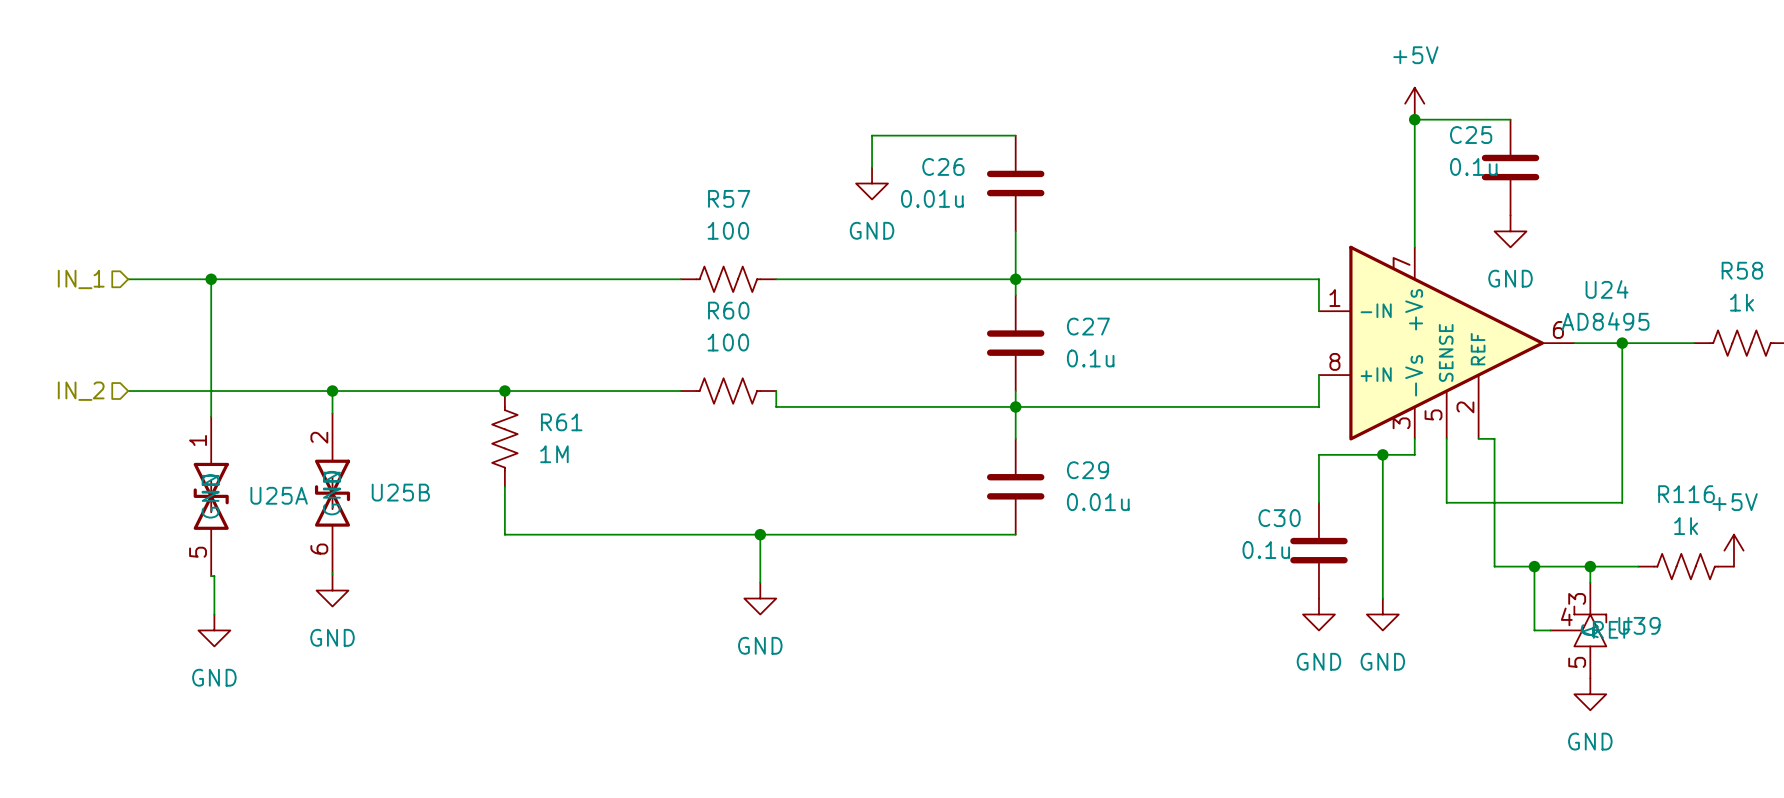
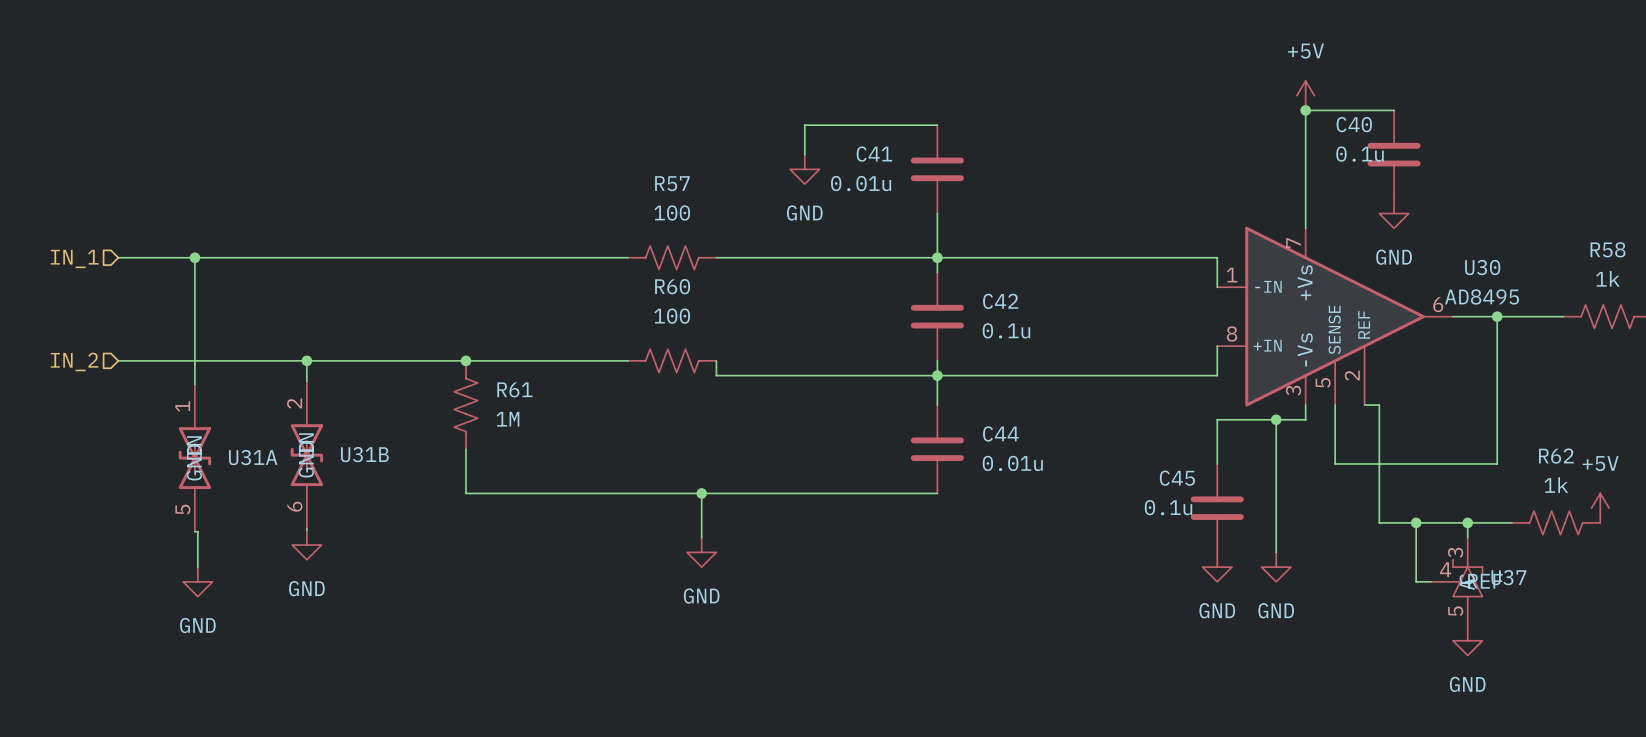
C25 name: C25 (1471, 135) -> C40 (1354, 124)
C26 name: C26 (943, 166) -> C41 (874, 154)
U24 name: U24 (1607, 289) -> U30 (1482, 267)
C27 name: C27 (1088, 326) -> C42 (1000, 301)
C29 name: C29 (1088, 470) -> C44 (1000, 433)
U25B name: U25B (400, 492) -> U31B (364, 454)
R116 name: R116 (1686, 494) -> R62 (1556, 456)
U25A name: U25A (279, 495) -> U31A (253, 457)
C30 name: C30 (1279, 518) -> C45 (1177, 478)
U39 name: U39 (1639, 625) -> U37 (1508, 577)

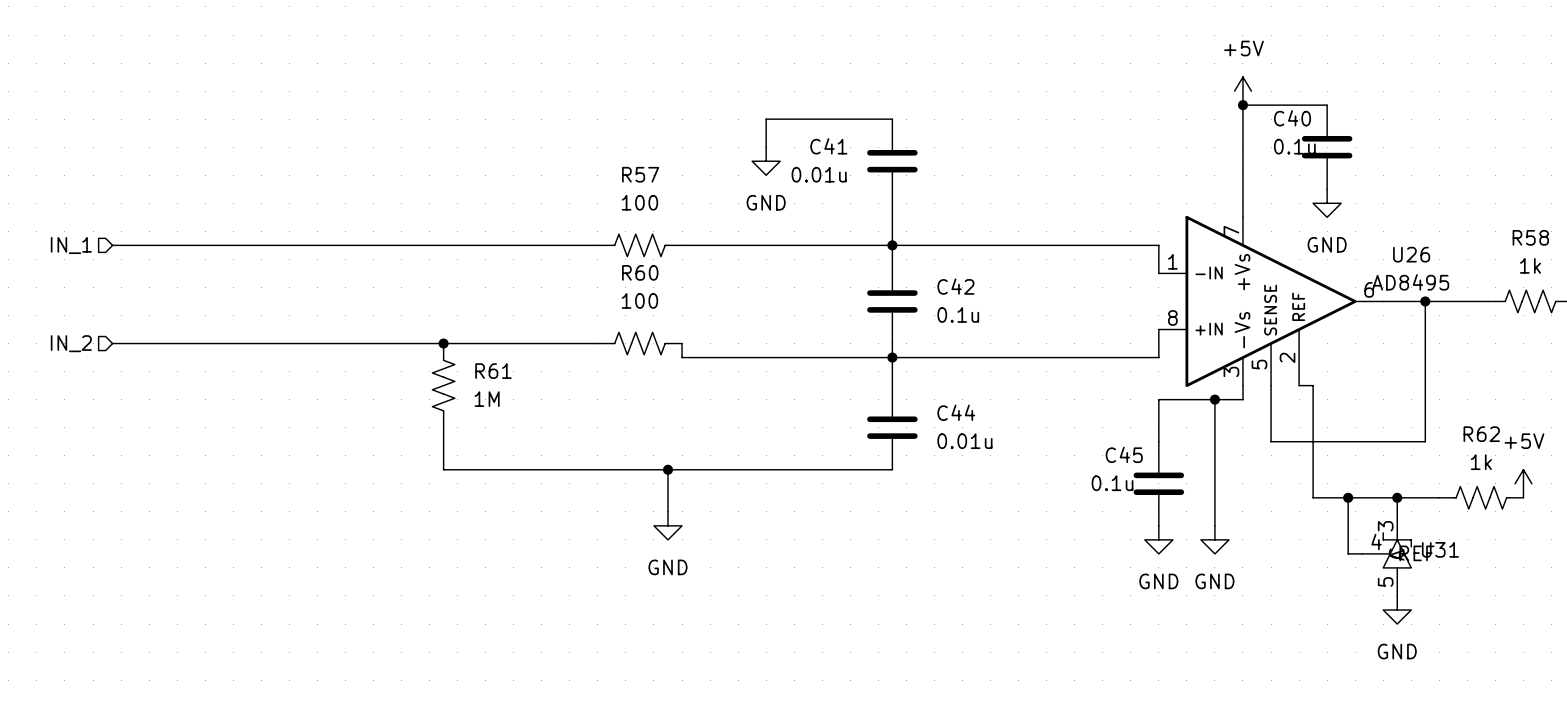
wire: (194, 257) (194, 384) -> none
junction: (194, 257) -> none
U30 name: U30 (1482, 267) -> U26 (1411, 254)
wire: (306, 360) (306, 381) -> none
junction: (306, 360) -> none
U31B: (306, 455) -> none
U31A: (194, 458) -> none
wire: (306, 528) (306, 530) -> none
wire: (194, 531) (197, 531) (197, 567) -> none
power symbol: GND (306, 545) -> none
U37 name: U37 (1508, 577) -> U31 (1440, 549)
power symbol: GND (197, 581) -> none

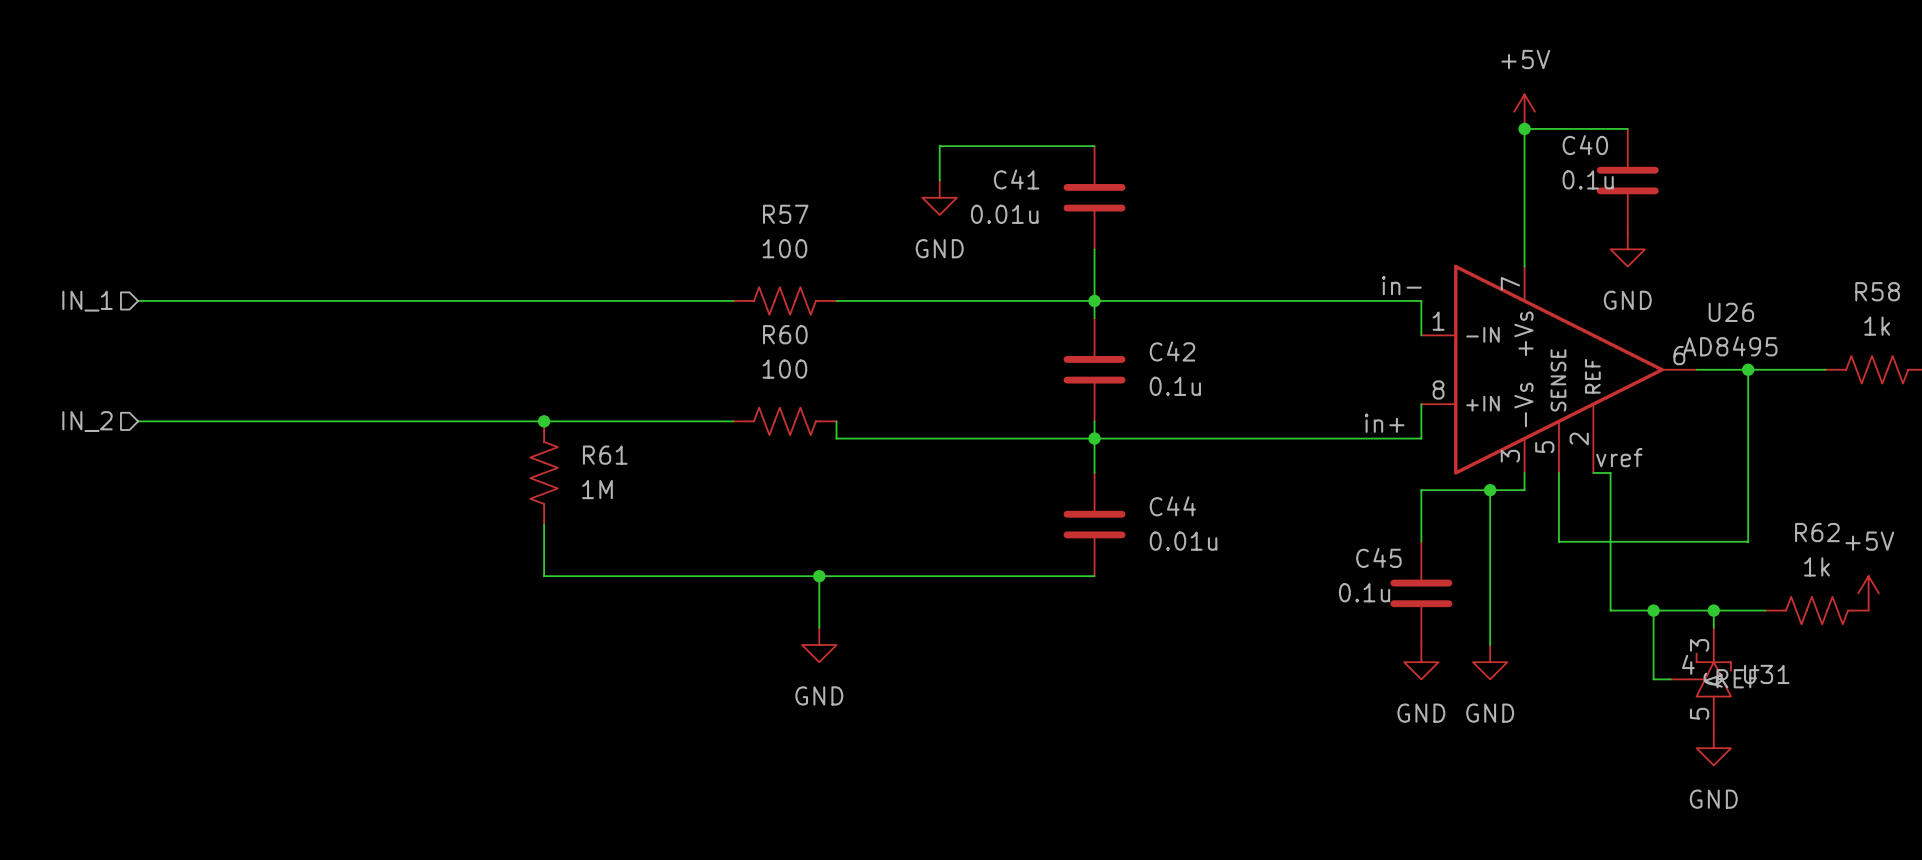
label: none -> in- (1401, 285)
label: none -> in+ (1384, 423)
label: none -> vref (1619, 457)

